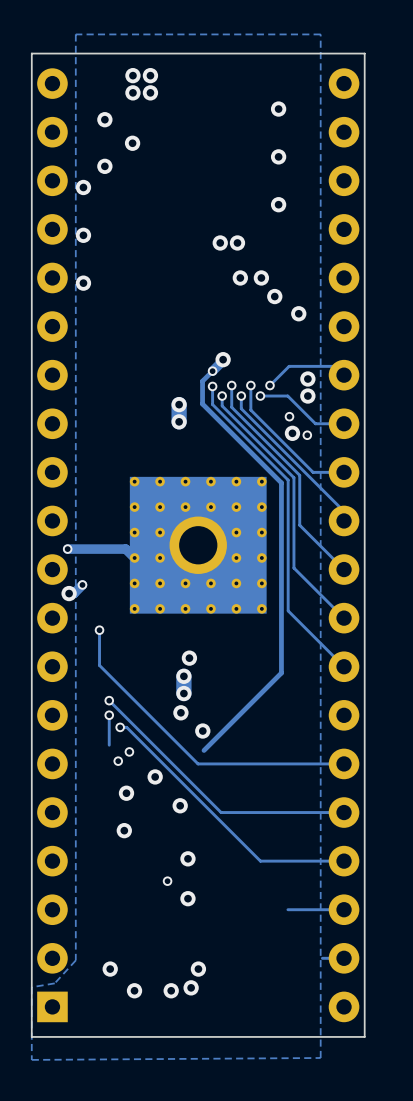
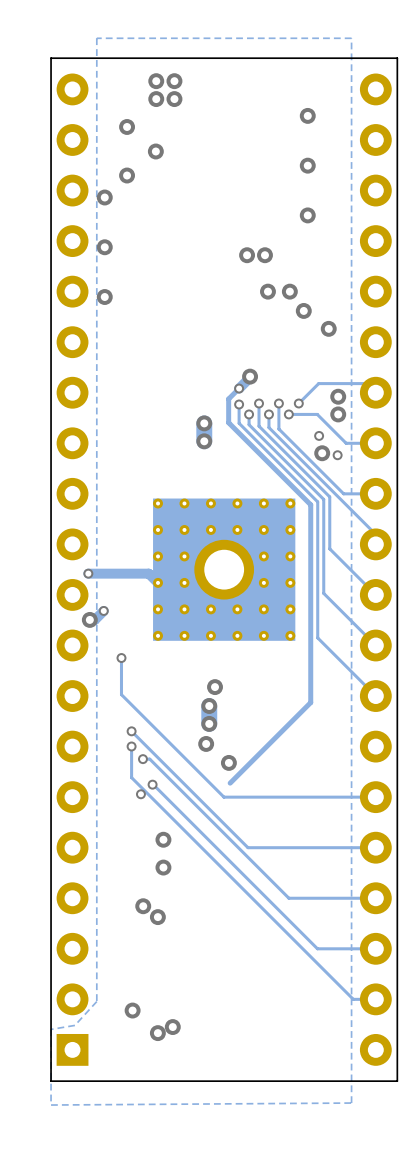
track: none -> (131, 777) (353, 999)
track: none -> (153, 784) (317, 948)
via: (155, 776) -> none
via position: (126, 793) -> (163, 839)
via: (180, 805) -> none
via: (124, 830) -> none
via: none -> (163, 867)
via: (187, 858) -> none
via: none -> (143, 906)
via: none -> (157, 917)
via: (167, 881) -> none
via: (187, 898) -> none
via: (198, 969) -> none
via: none -> (172, 1027)
via: (191, 987) -> none
via: (171, 990) -> none

